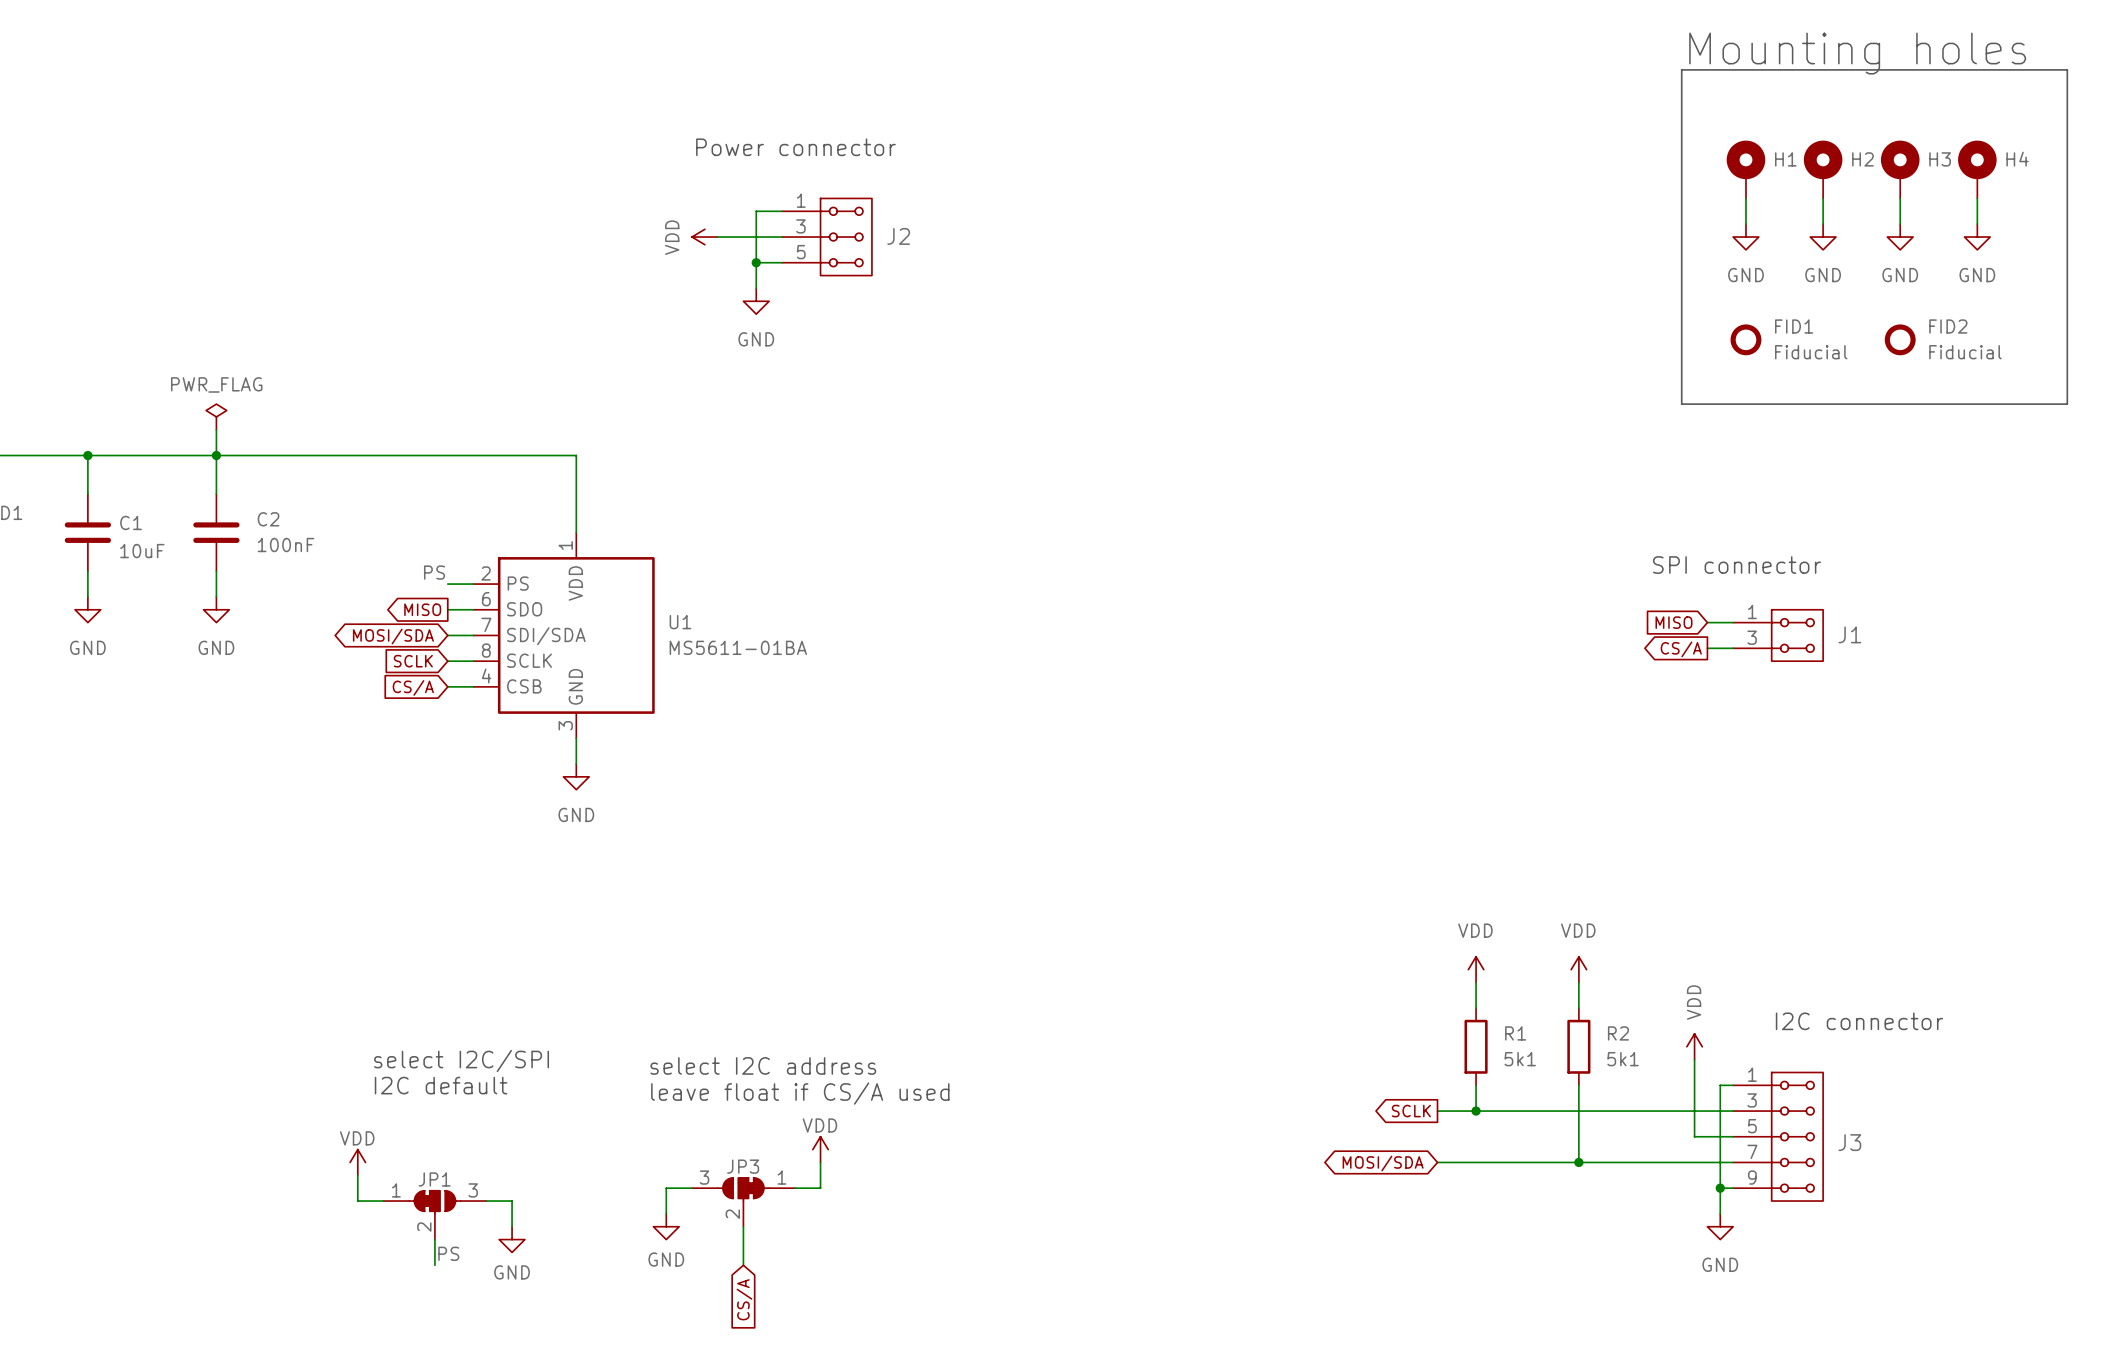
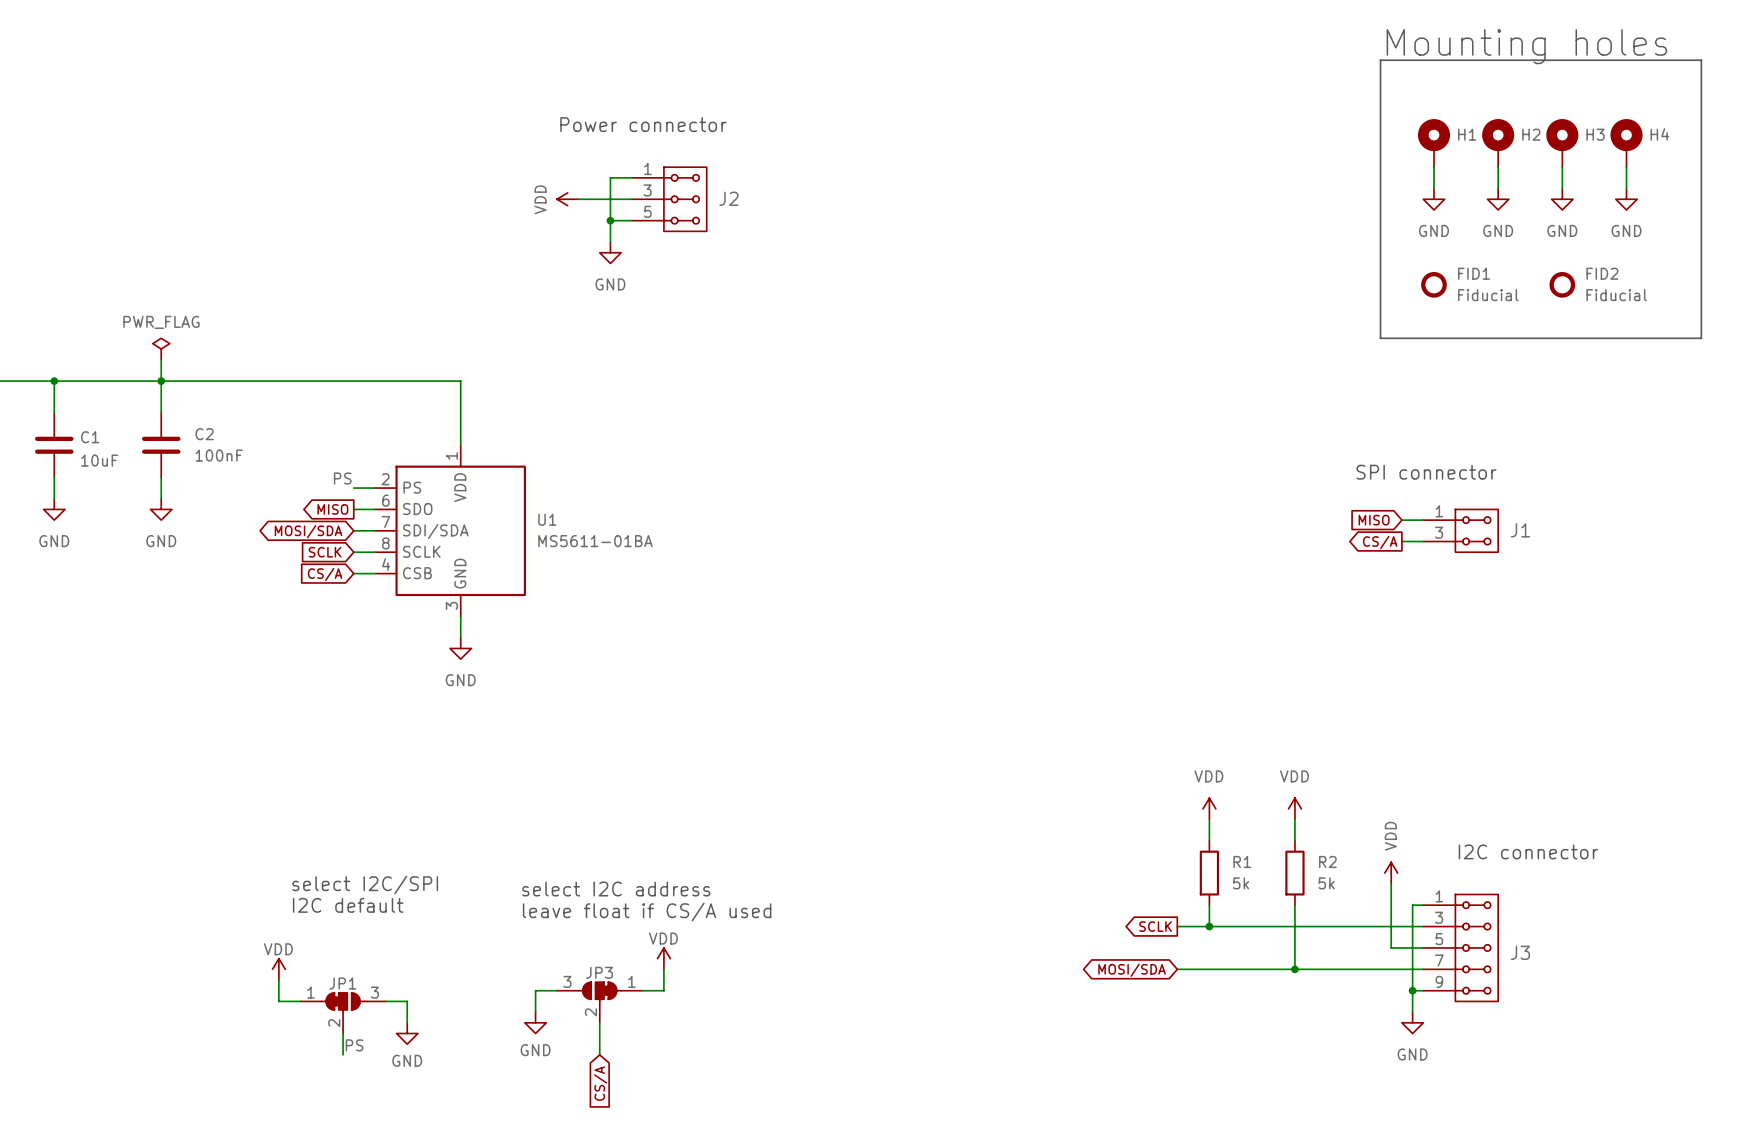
R1 value: 5k1 (1520, 1059) -> 5k (1241, 883)
R2 value: 5k1 (1623, 1059) -> 5k (1326, 883)

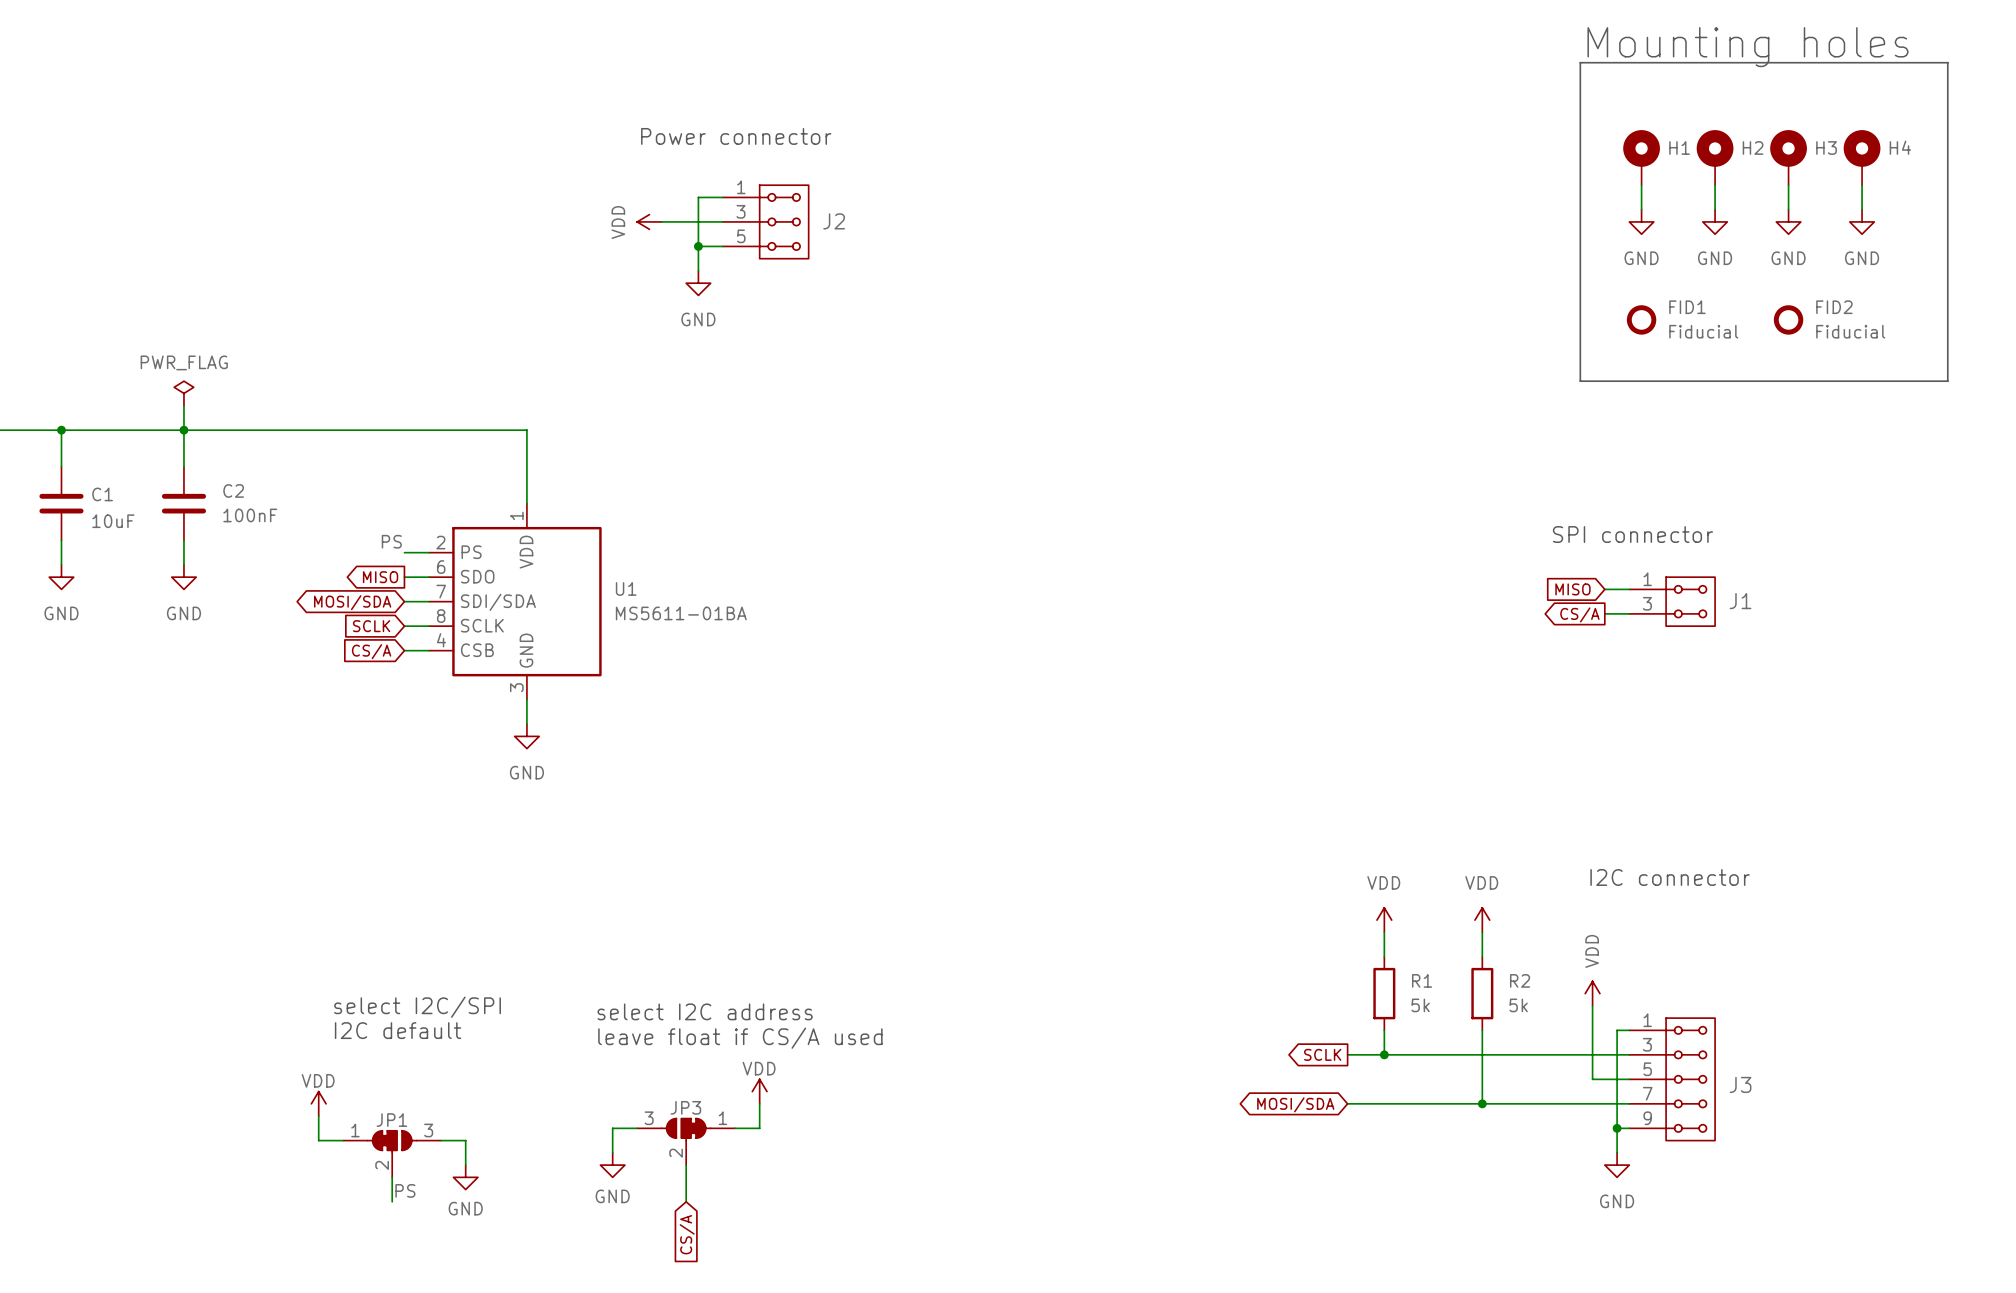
text position: I2C connector (1528, 851) -> I2C connector (1670, 877)

